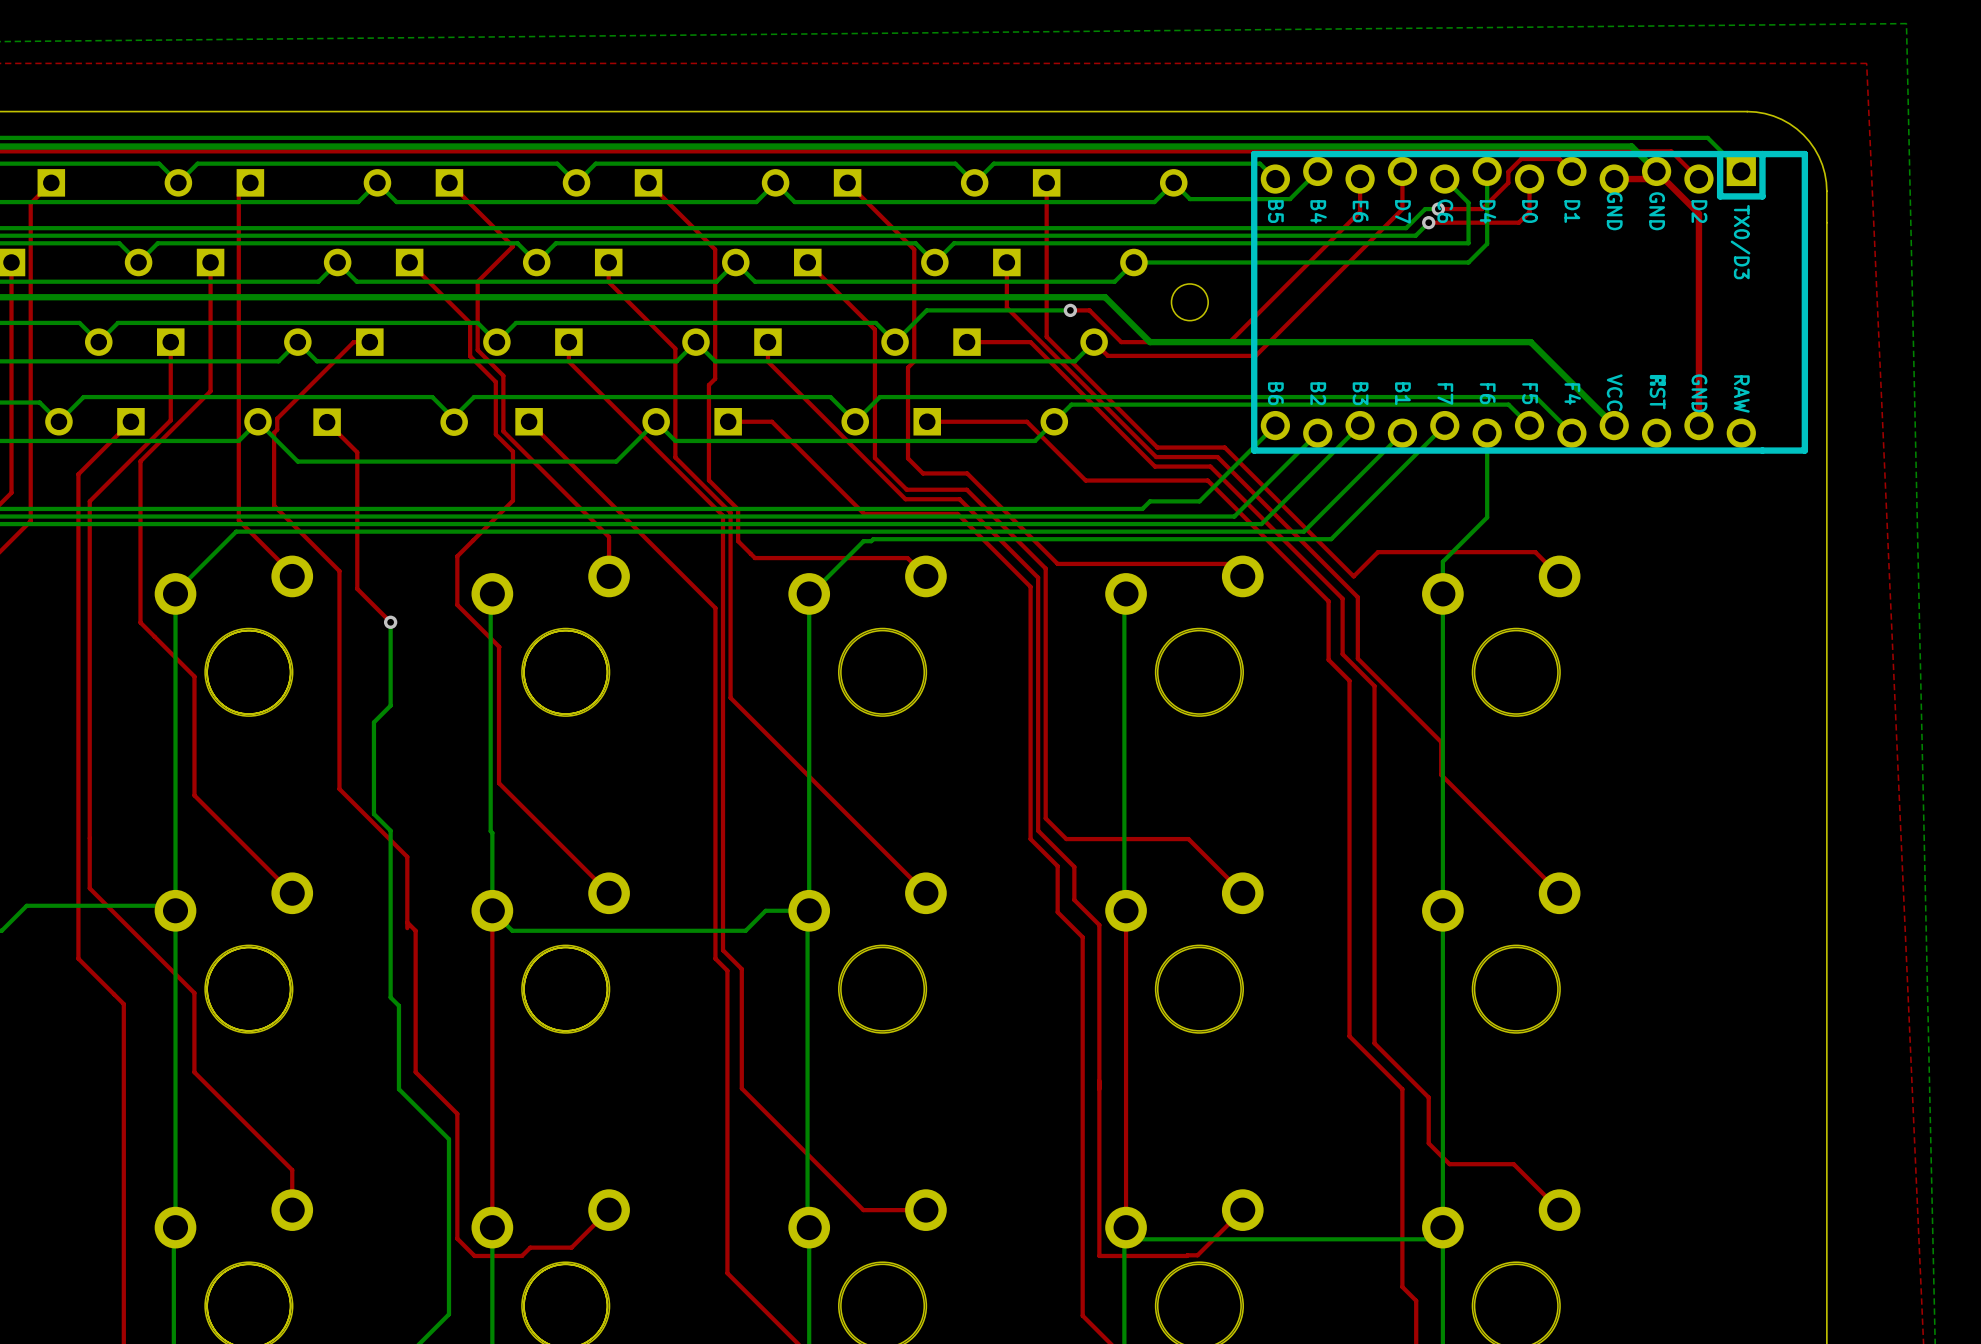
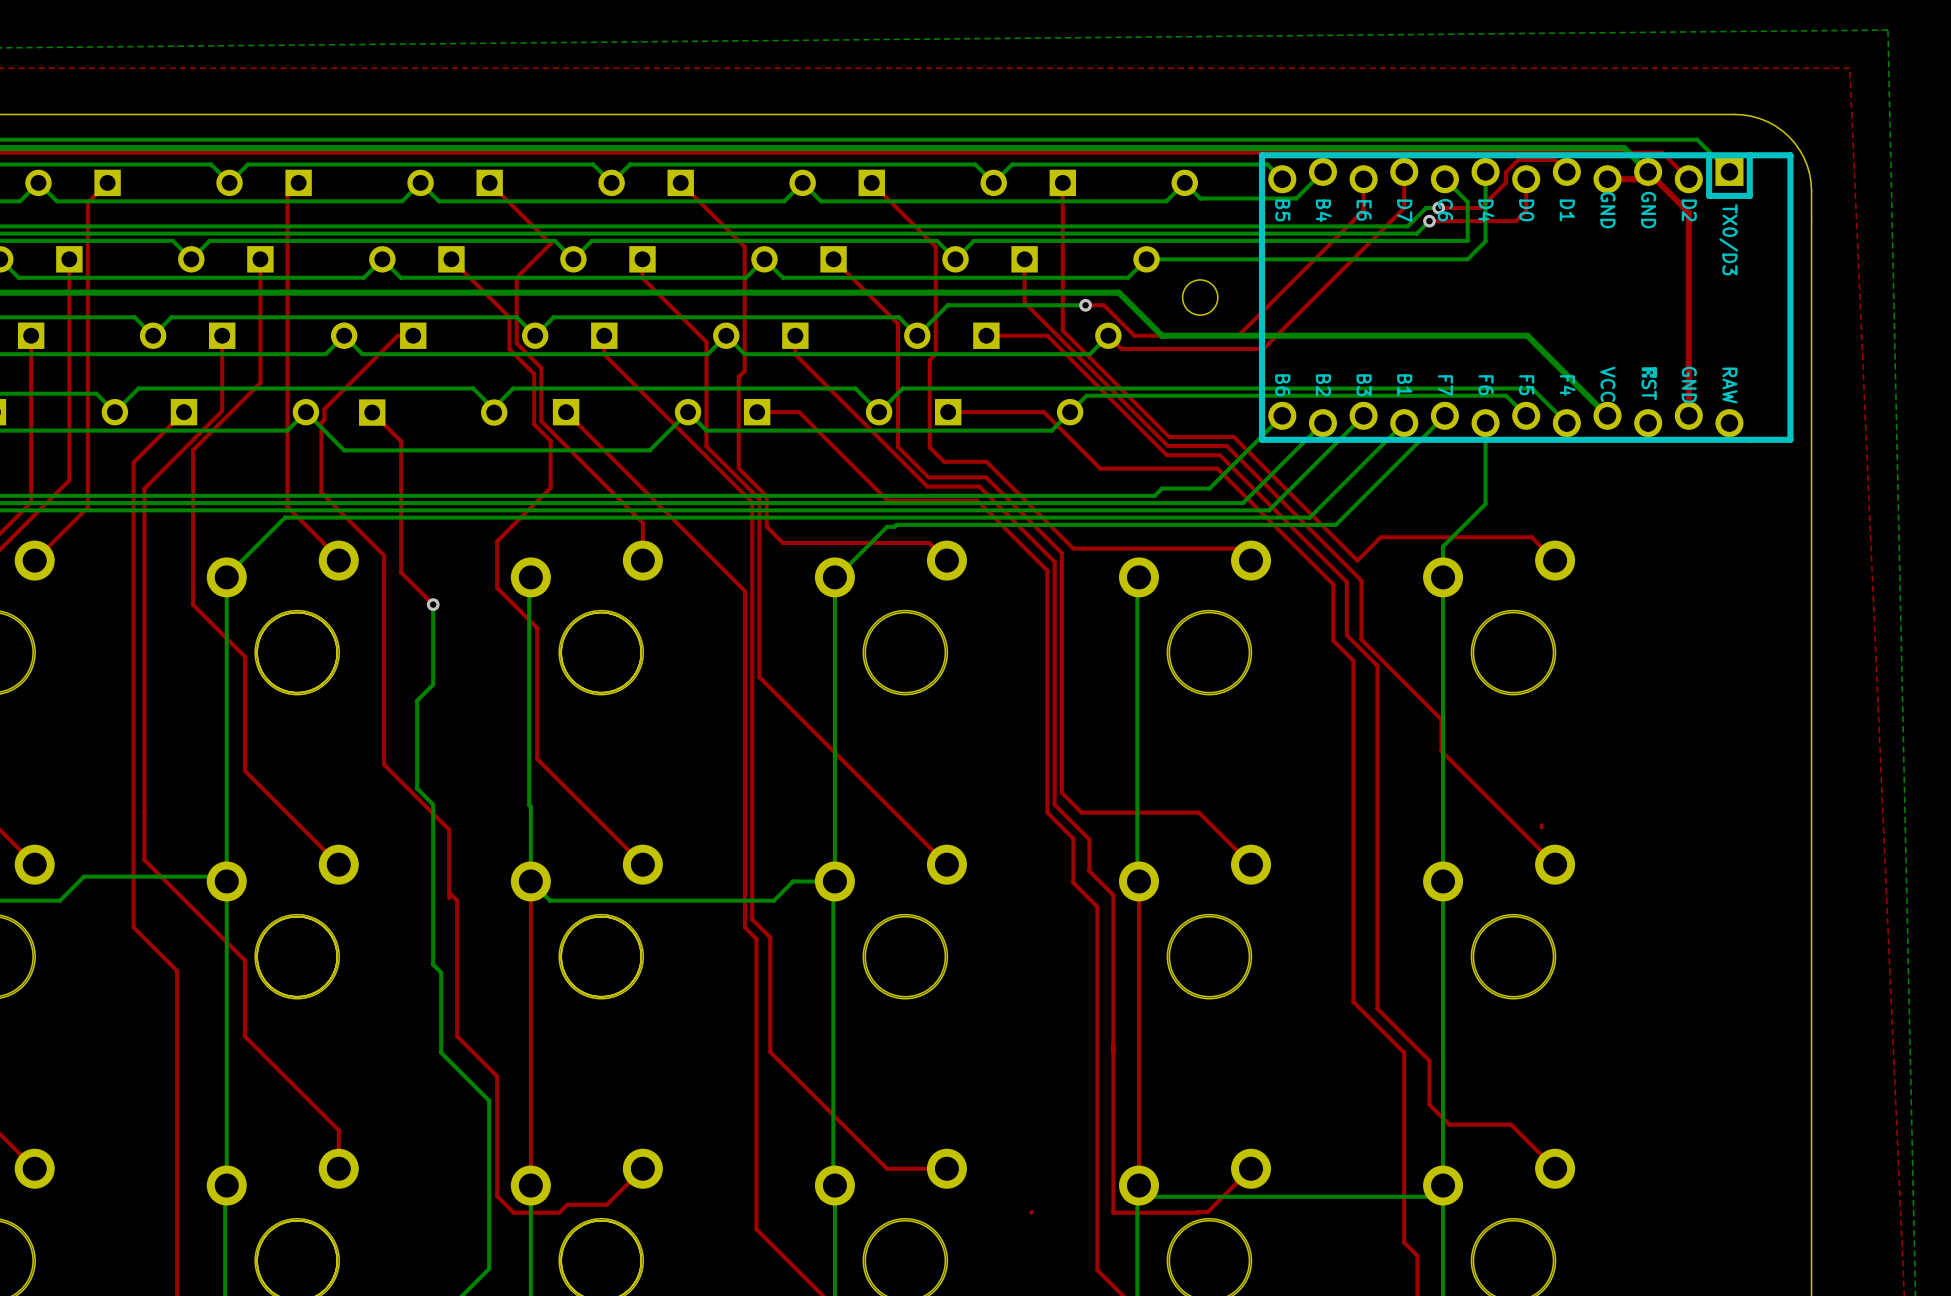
top track: none -> (1541, 825) (1541, 827)
top track: none -> (1031, 1212) (1031, 1212)

